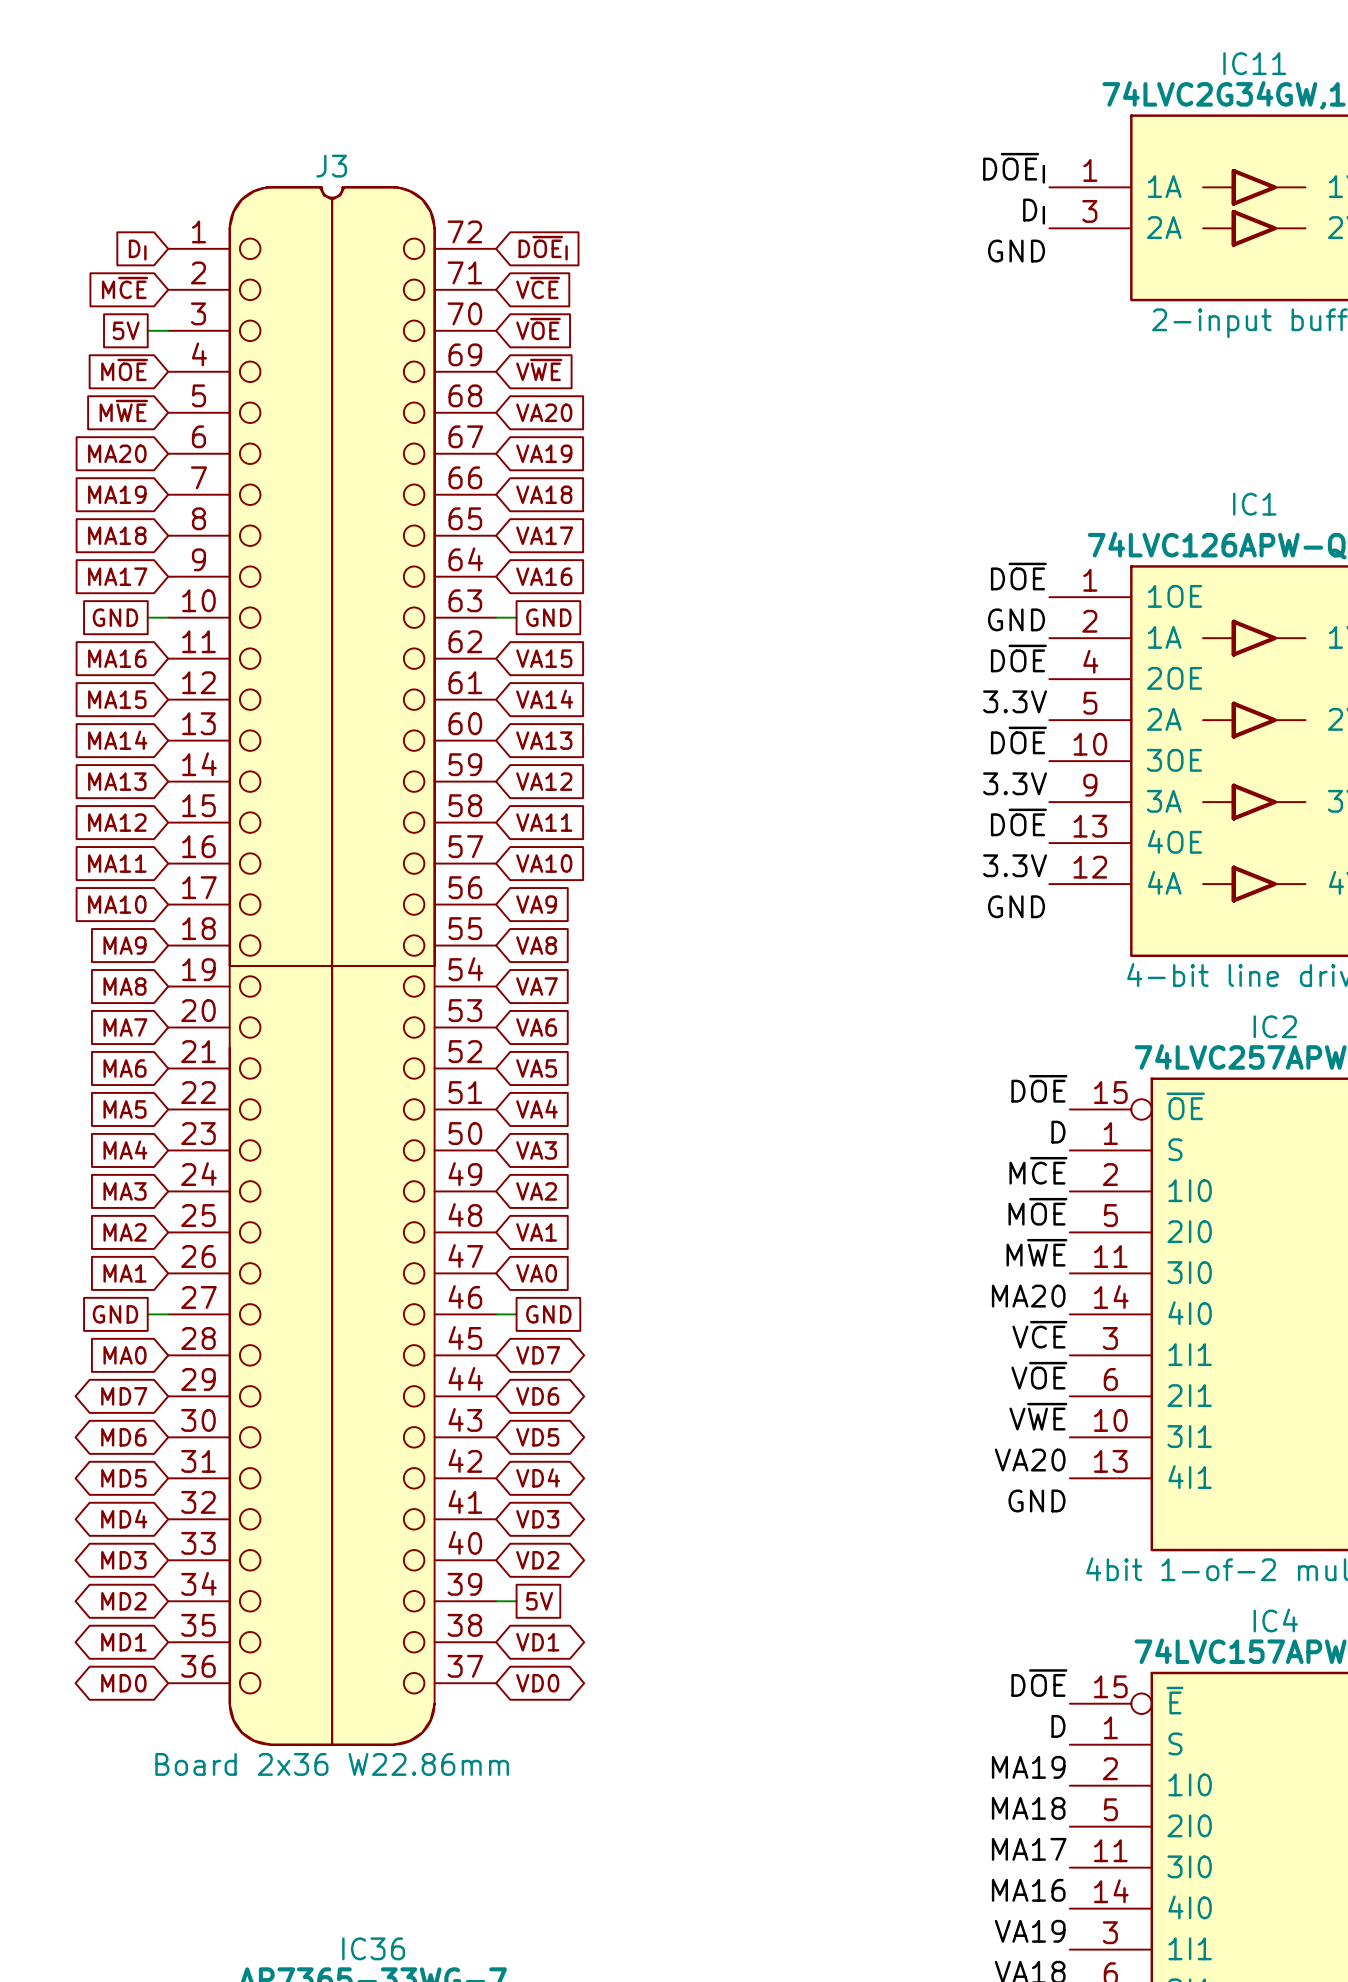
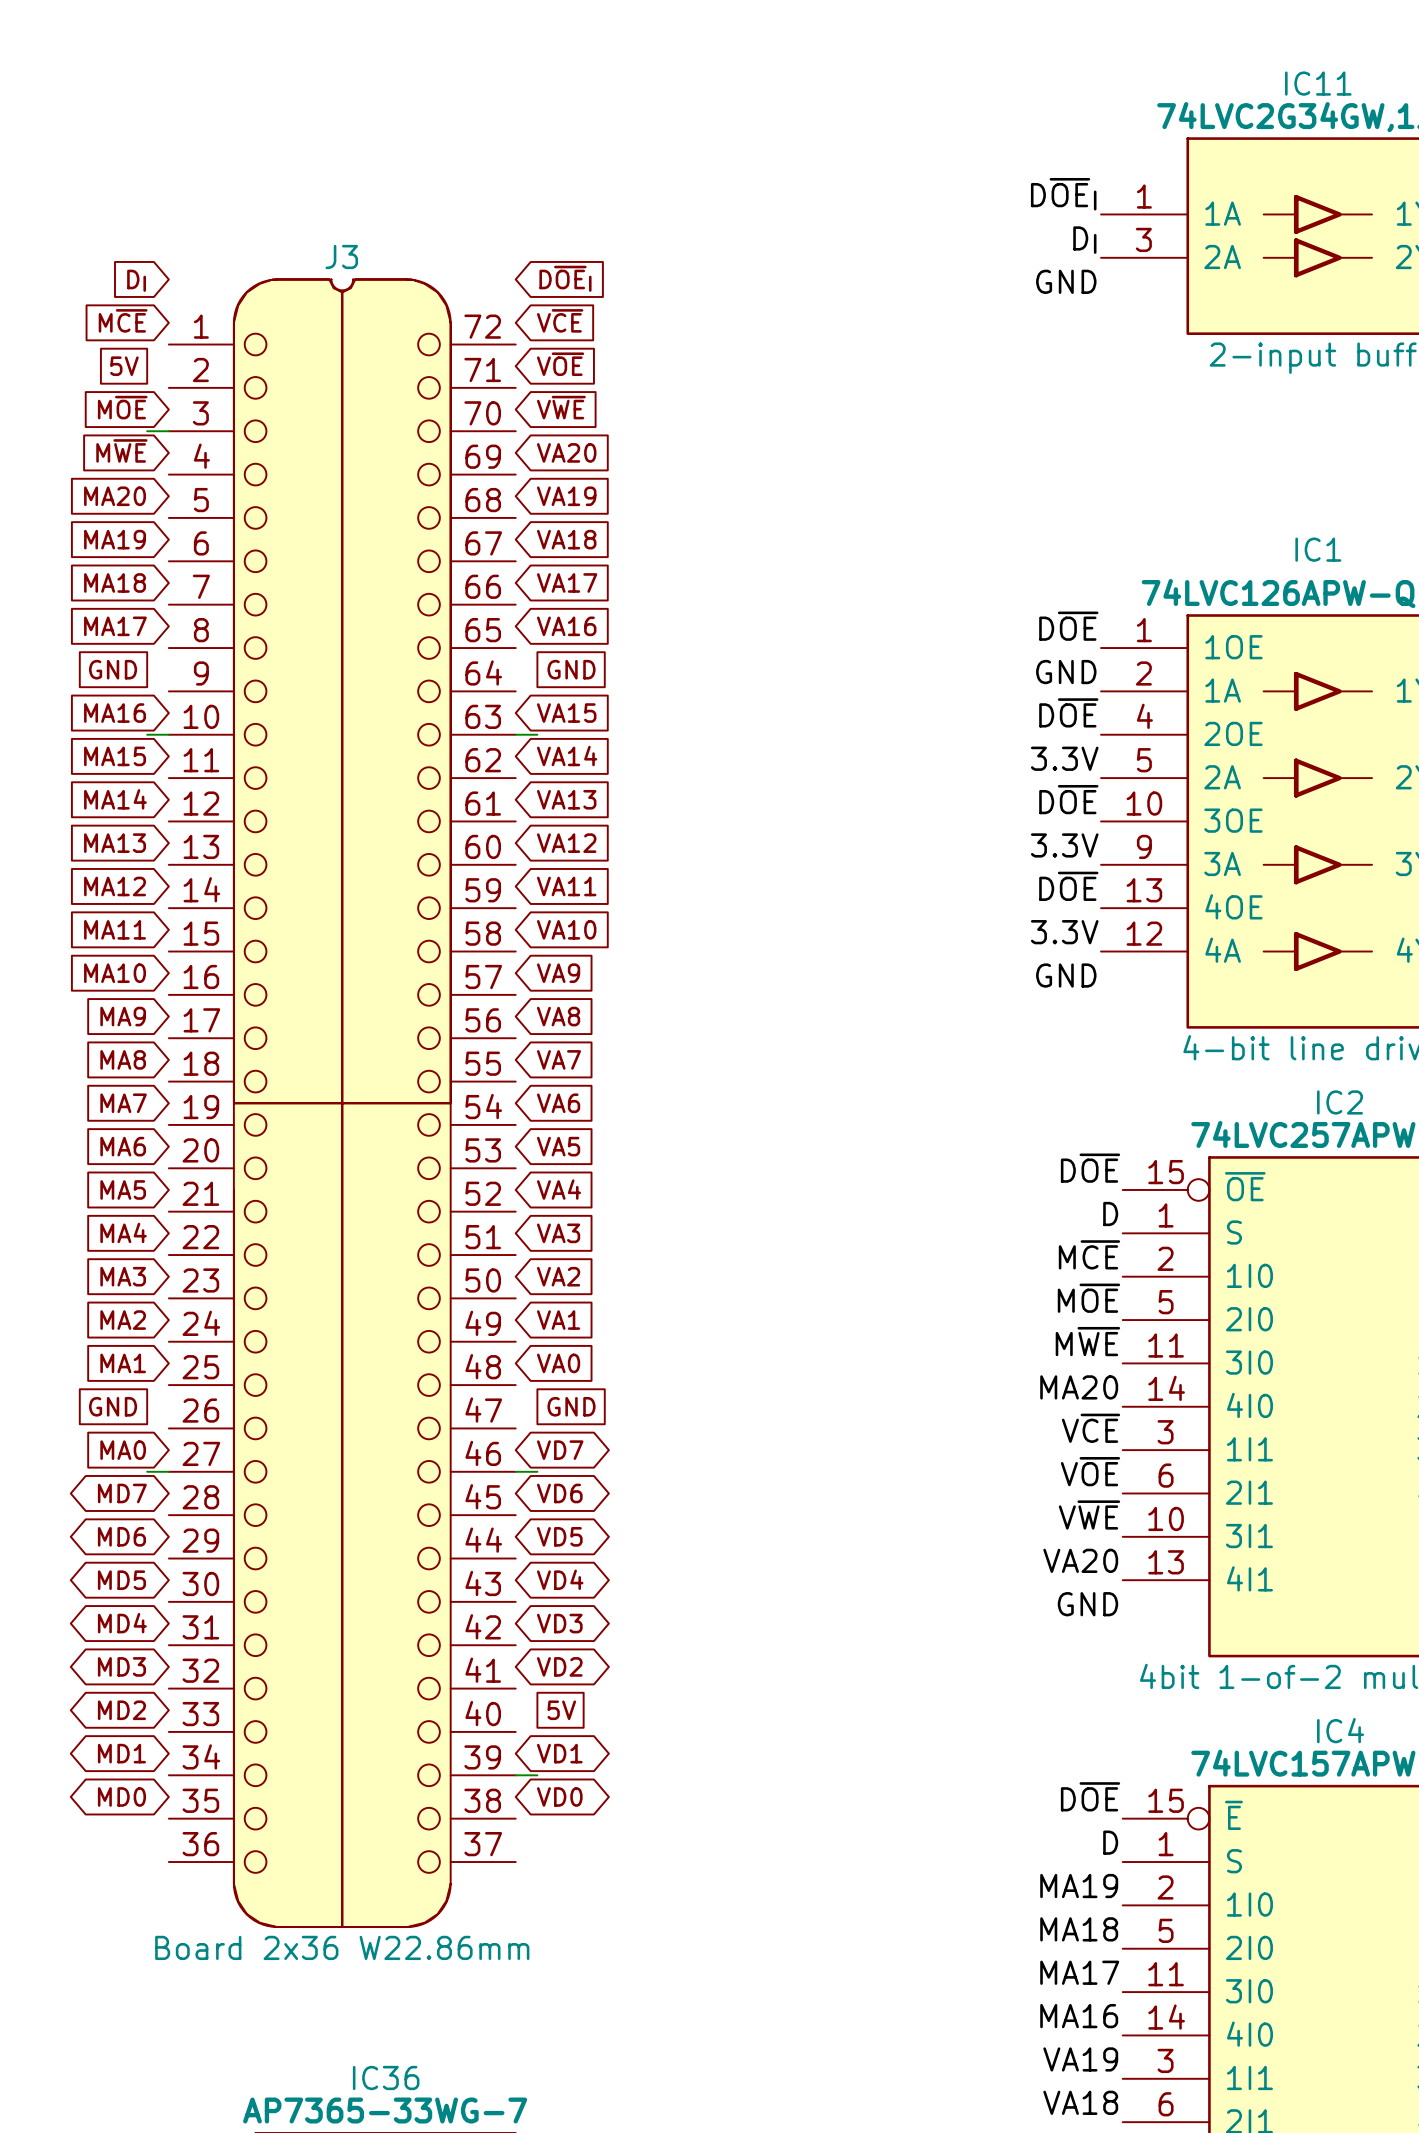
wire: (147, 330) (168, 330) -> (147, 431) (168, 431)
wire: (147, 617) (168, 617) -> (147, 734) (168, 734)
wire: (496, 617) (516, 617) -> (515, 734) (537, 734)
J3 position: (332, 966) -> (342, 1103)
wire: (147, 1314) (168, 1314) -> (147, 1471) (168, 1471)
wire: (496, 1314) (516, 1314) -> (515, 1471) (537, 1471)
wire: (496, 1601) (516, 1601) -> (515, 1775) (537, 1775)

